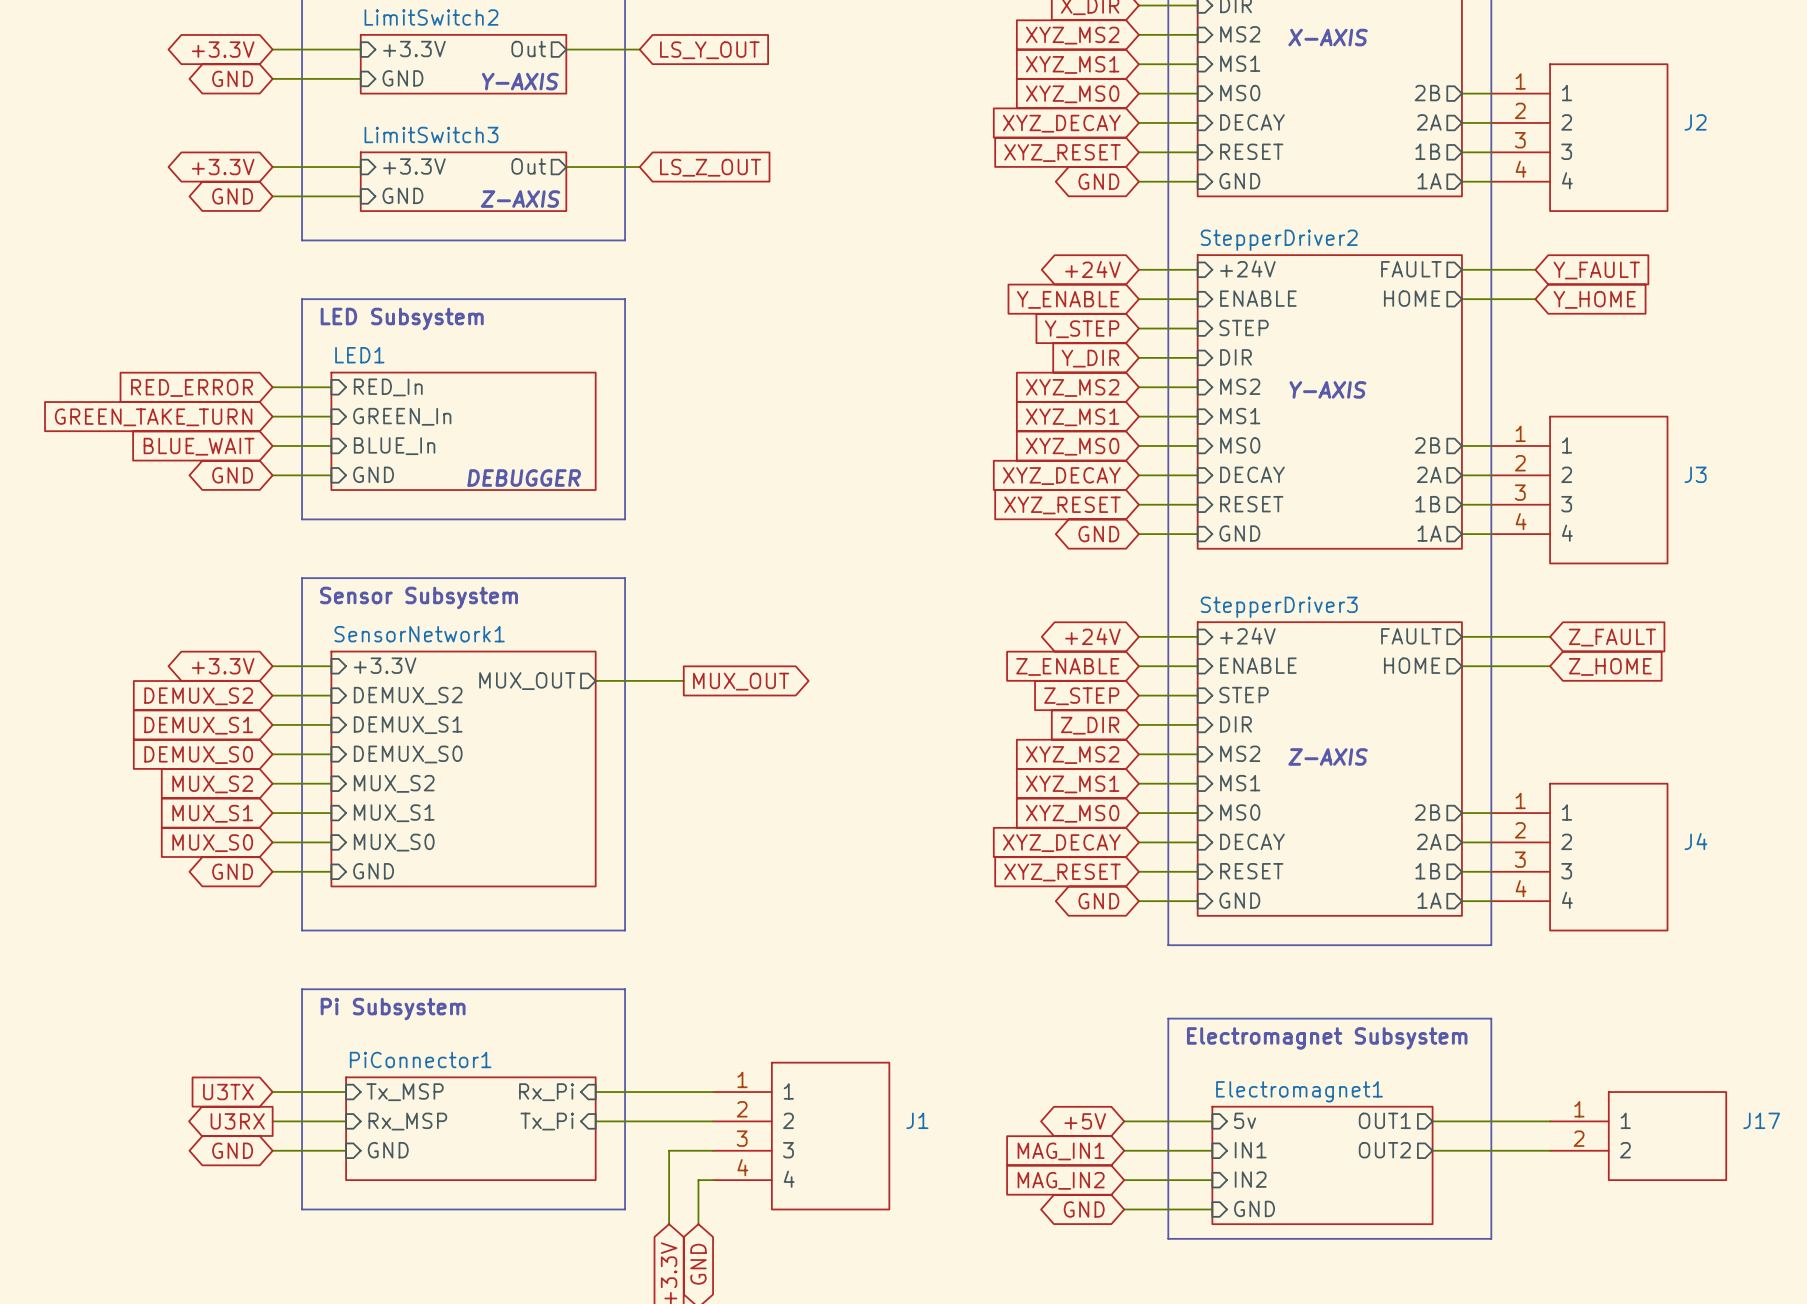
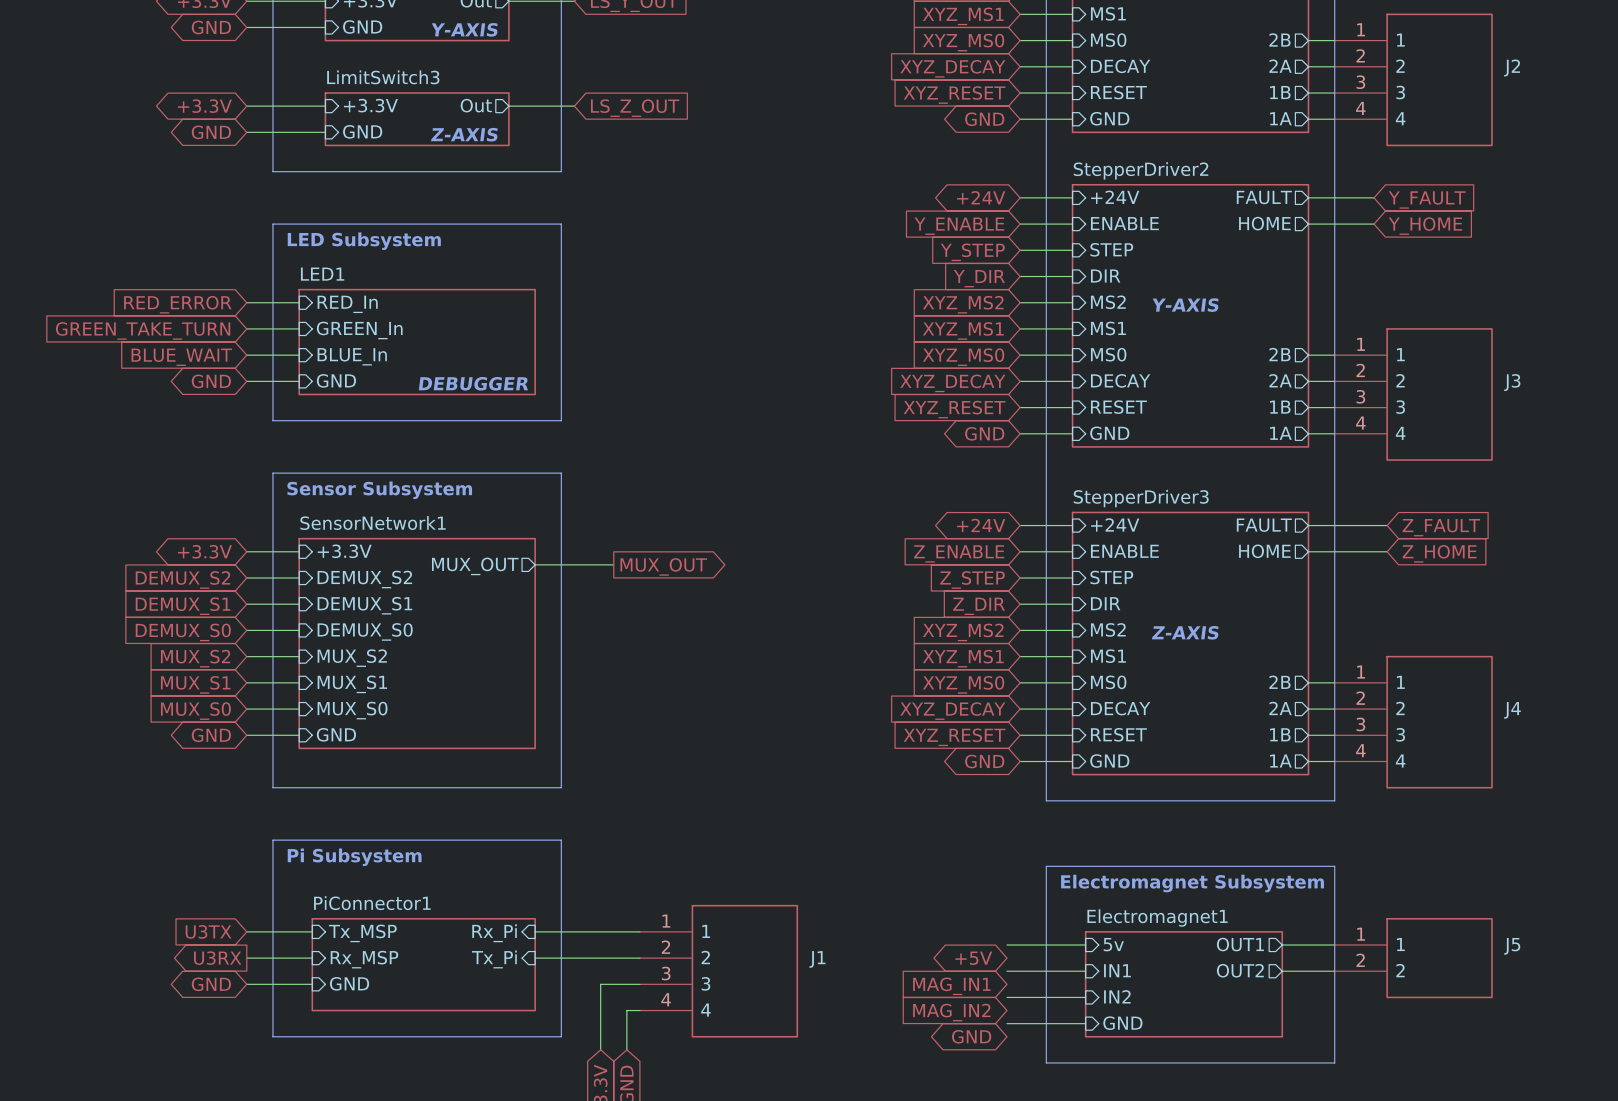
wire: none -> (1282, 945) (1334, 945)
sheet pin position: 5v (1245, 1120) -> 5v (1113, 944)
sheet pin position: OUT1 (1384, 1120) -> OUT1 (1240, 944)
wire: (1124, 1121) (1212, 1121) -> (1007, 945) (1085, 945)
wire: (1432, 1121) (1550, 1121) -> none
J5: none -> (1413, 958)
wire: none -> (1282, 971) (1334, 971)
J17: (1638, 1136) -> none
wire: (1124, 1150) (1212, 1150) -> (1007, 971) (1085, 971)
sheet pin position: IN1 (1250, 1150) -> IN1 (1117, 970)
sheet pin position: OUT2 (1384, 1150) -> OUT2 (1240, 970)
wire: (1432, 1150) (1550, 1150) -> none
sheet Electromagnet1 position: (1322, 1165) -> (1183, 984)
sheet pin position: IN2 (1250, 1179) -> IN2 (1117, 996)
wire: (1124, 1180) (1212, 1180) -> (1007, 997) (1085, 997)
sheet pin position: GND (1254, 1208) -> GND (1122, 1023)
wire: (1124, 1209) (1212, 1209) -> (1007, 1023) (1085, 1023)

